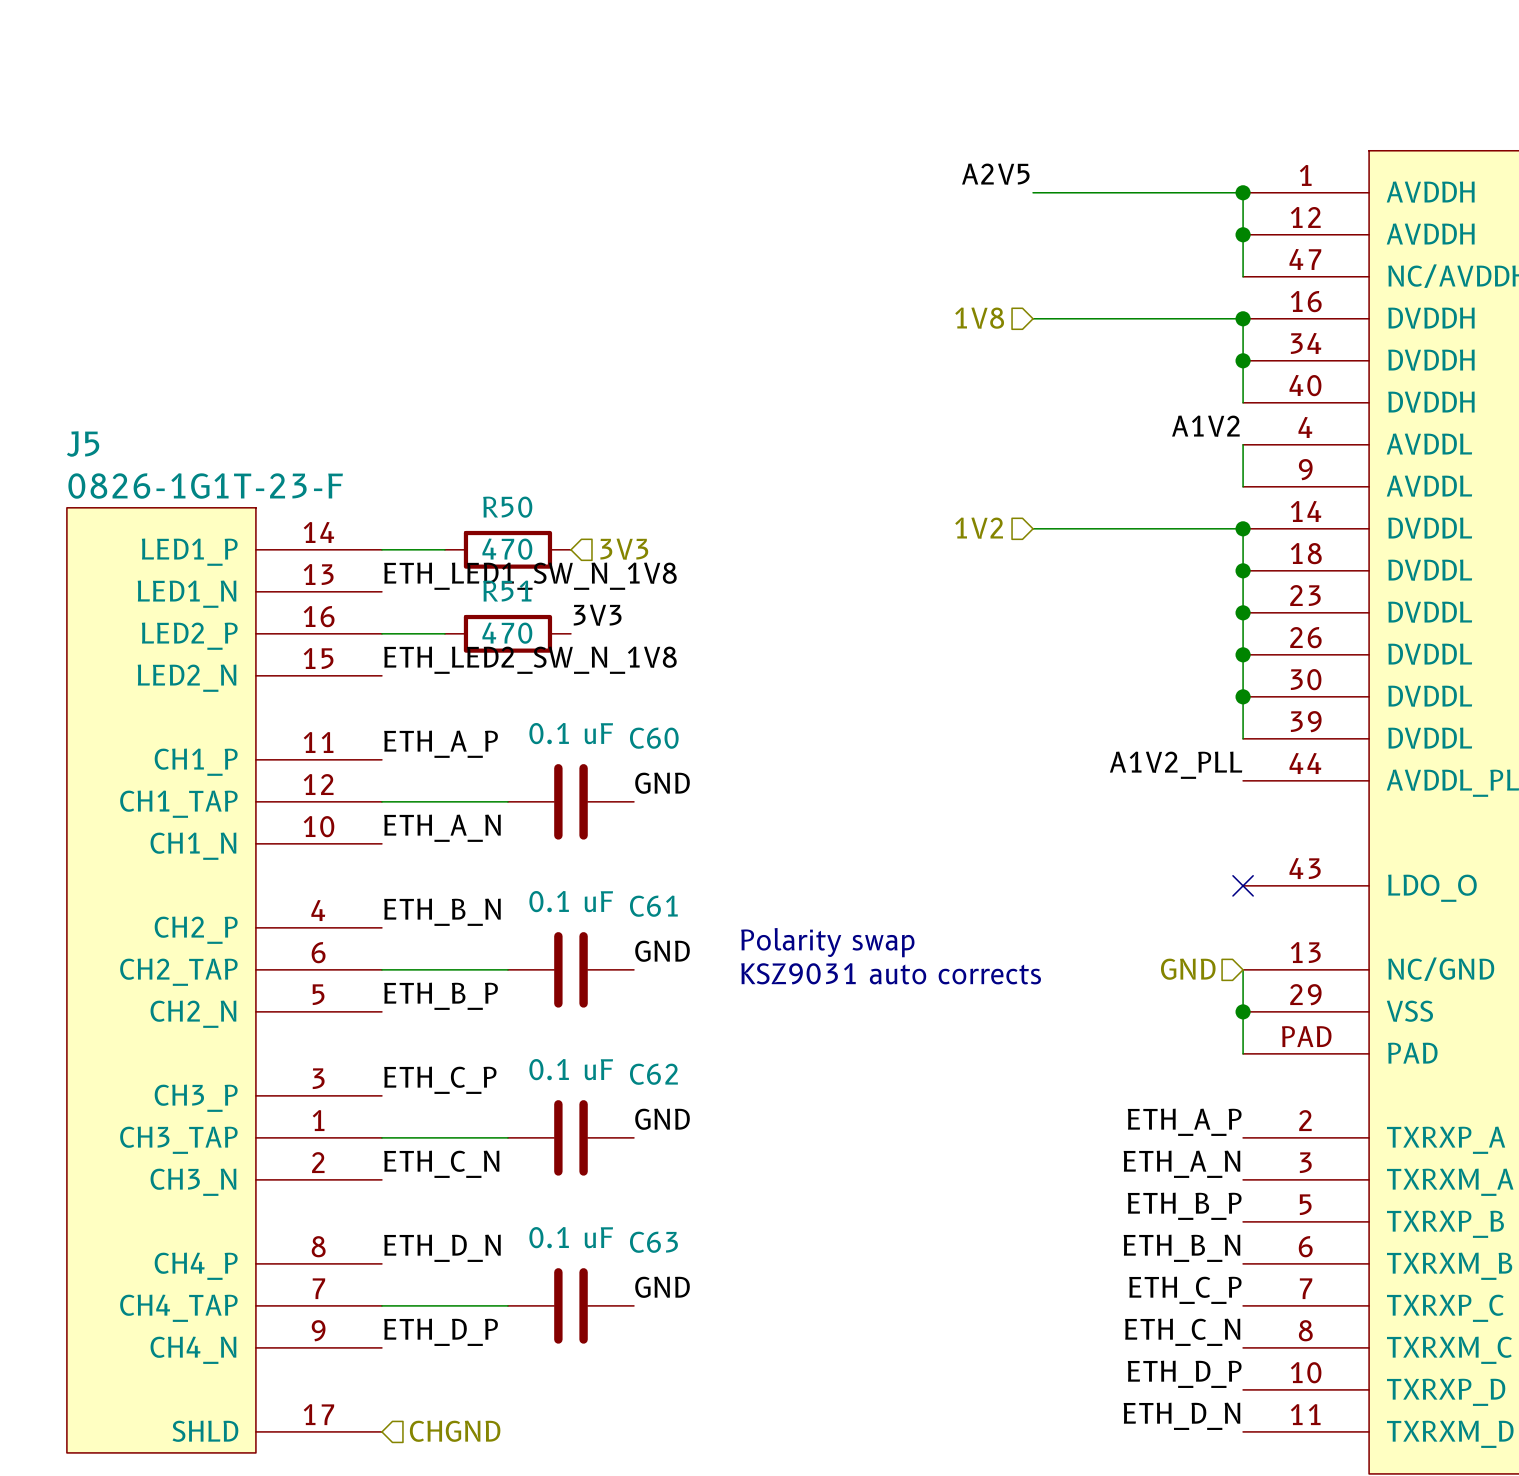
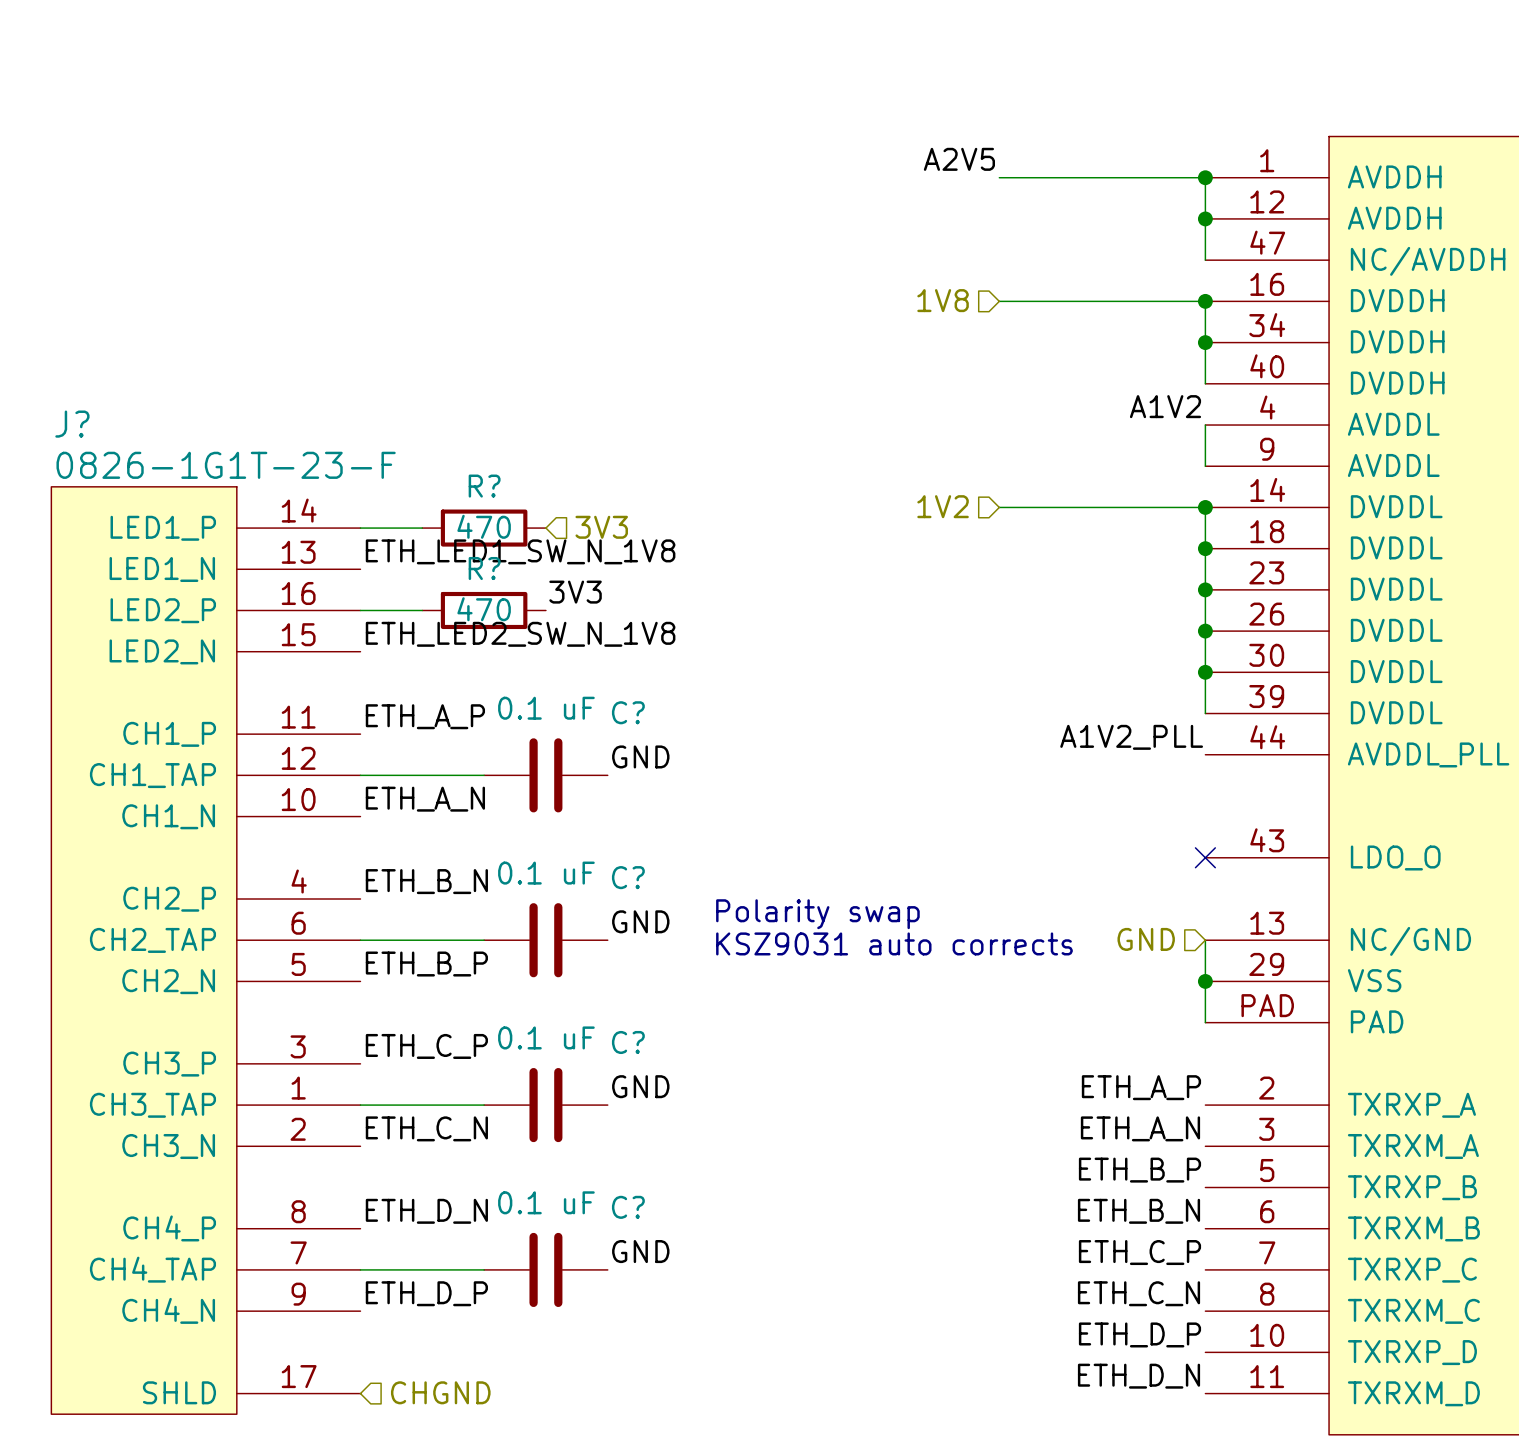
J5 name: J5 (83, 444) -> J? (72, 424)
R50 name: R50 (507, 507) -> R? (484, 486)
R51 name: R51 (507, 591) -> R? (484, 568)
C60 name: C60 (654, 738) -> C? (628, 712)
C61 name: C61 (653, 906) -> C? (628, 877)
C62 name: C62 (653, 1074) -> C? (628, 1042)
C63 name: C63 (653, 1242) -> C? (628, 1207)

